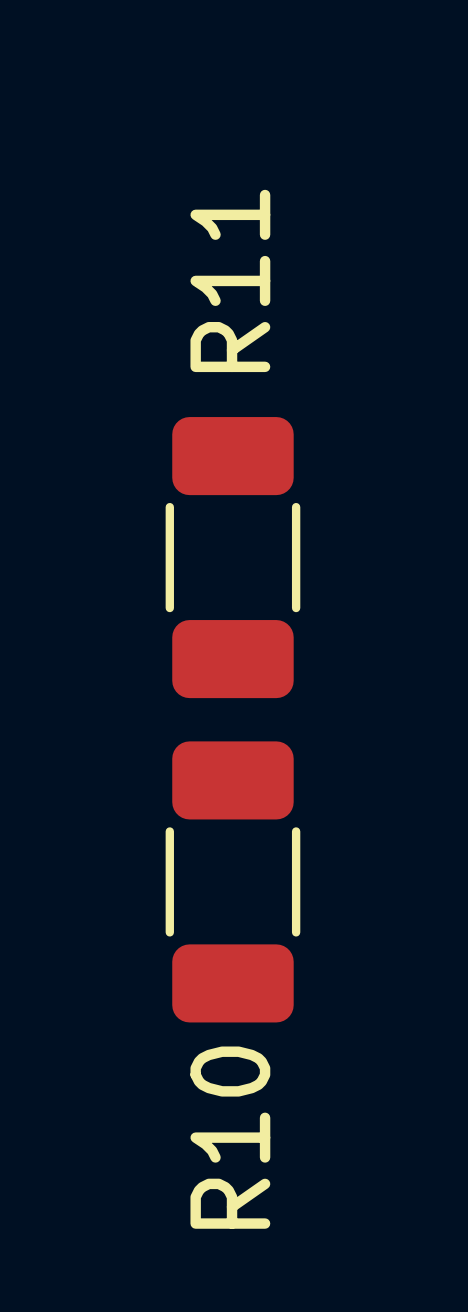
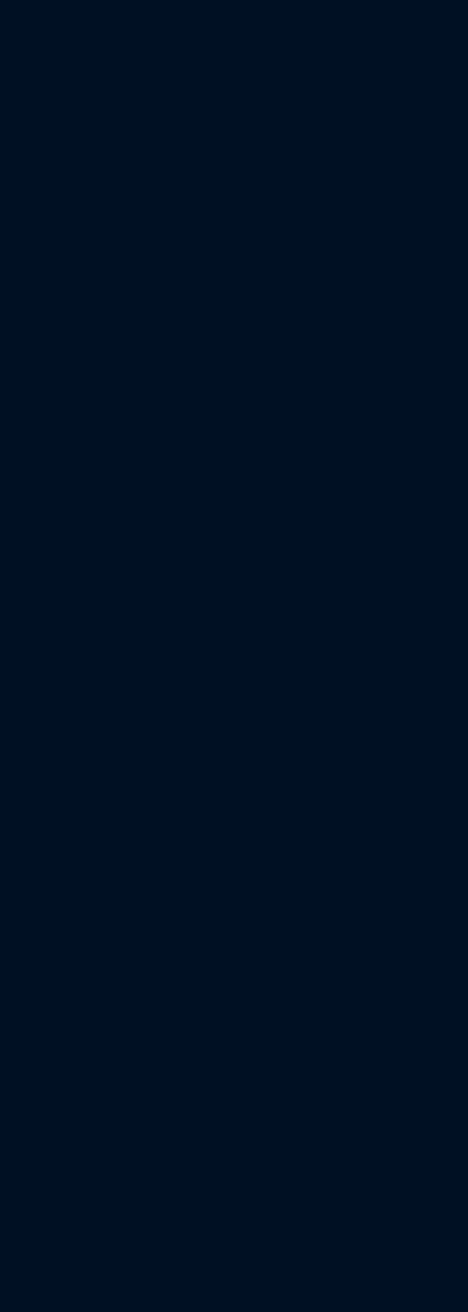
R11: (232, 557) -> none
R10: (232, 881) -> none

